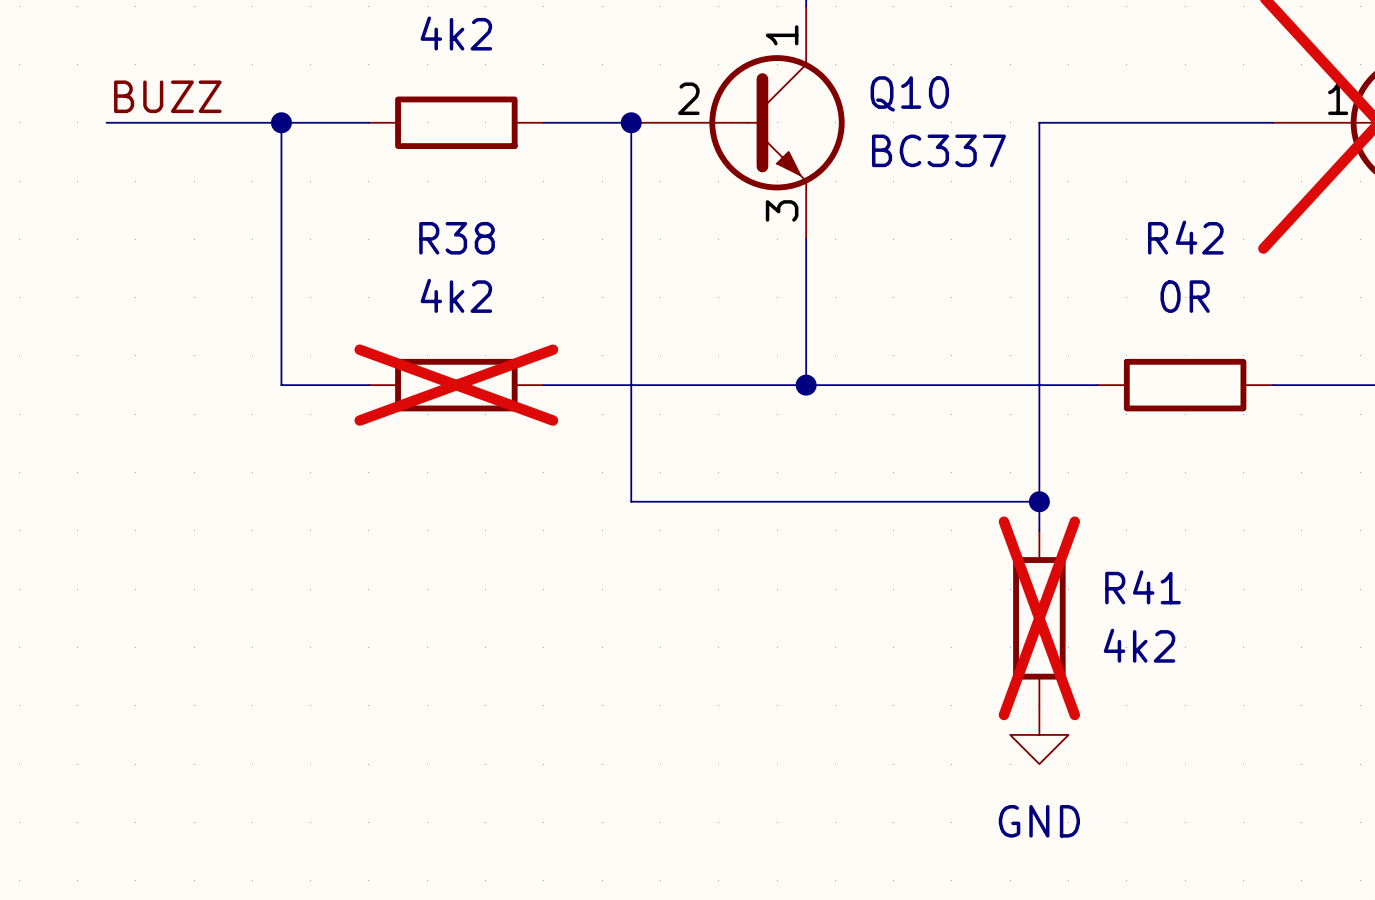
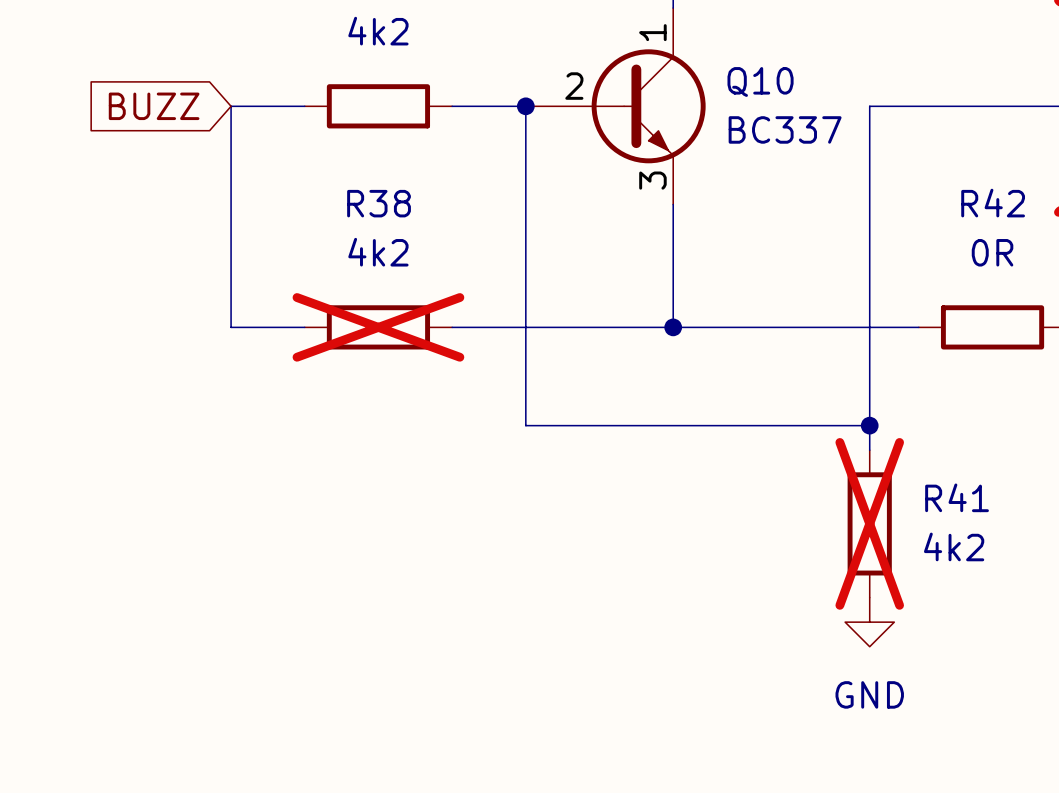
label: BUZZ (167, 96) -> none
wire: (106, 122) (281, 122) -> none
global label: none -> BUZZ (154, 106)
junction: (281, 122) -> none

